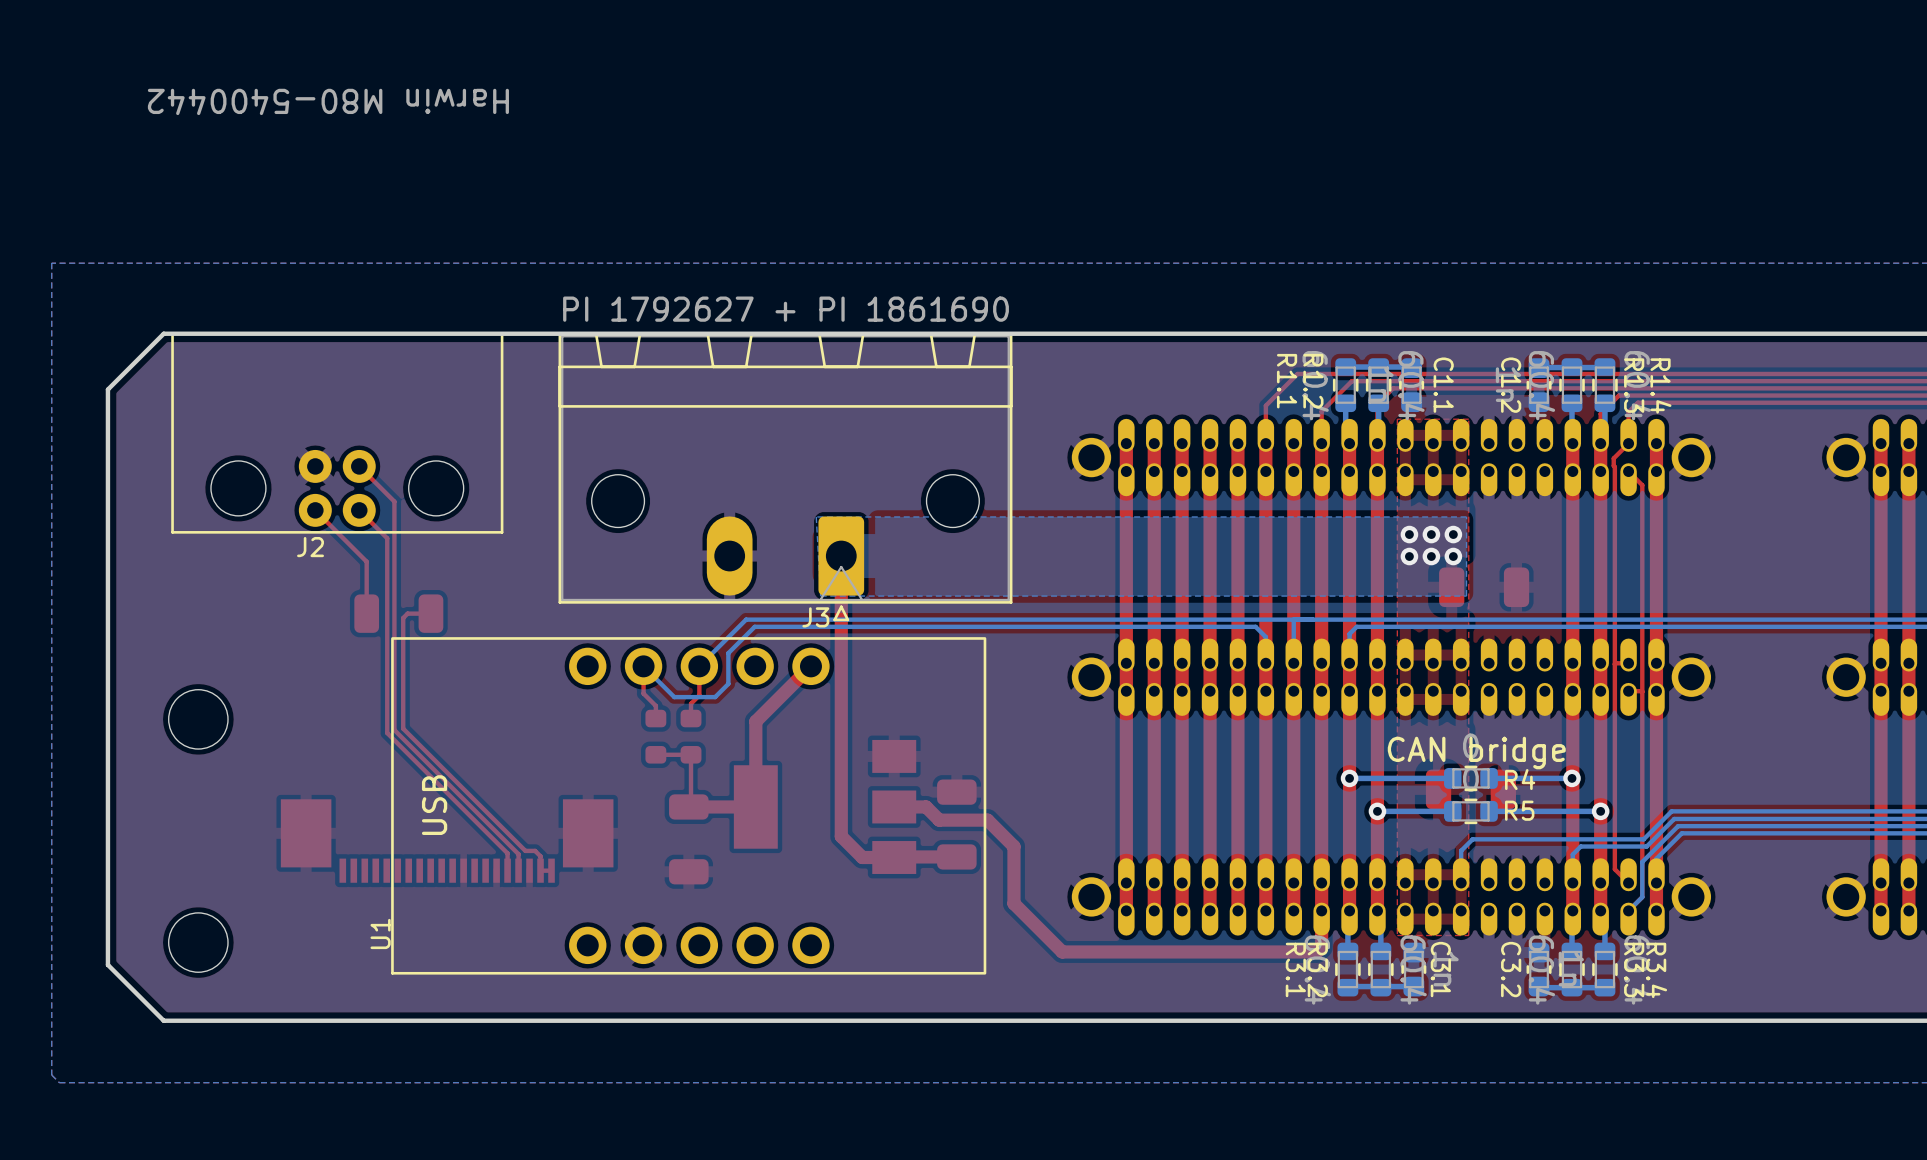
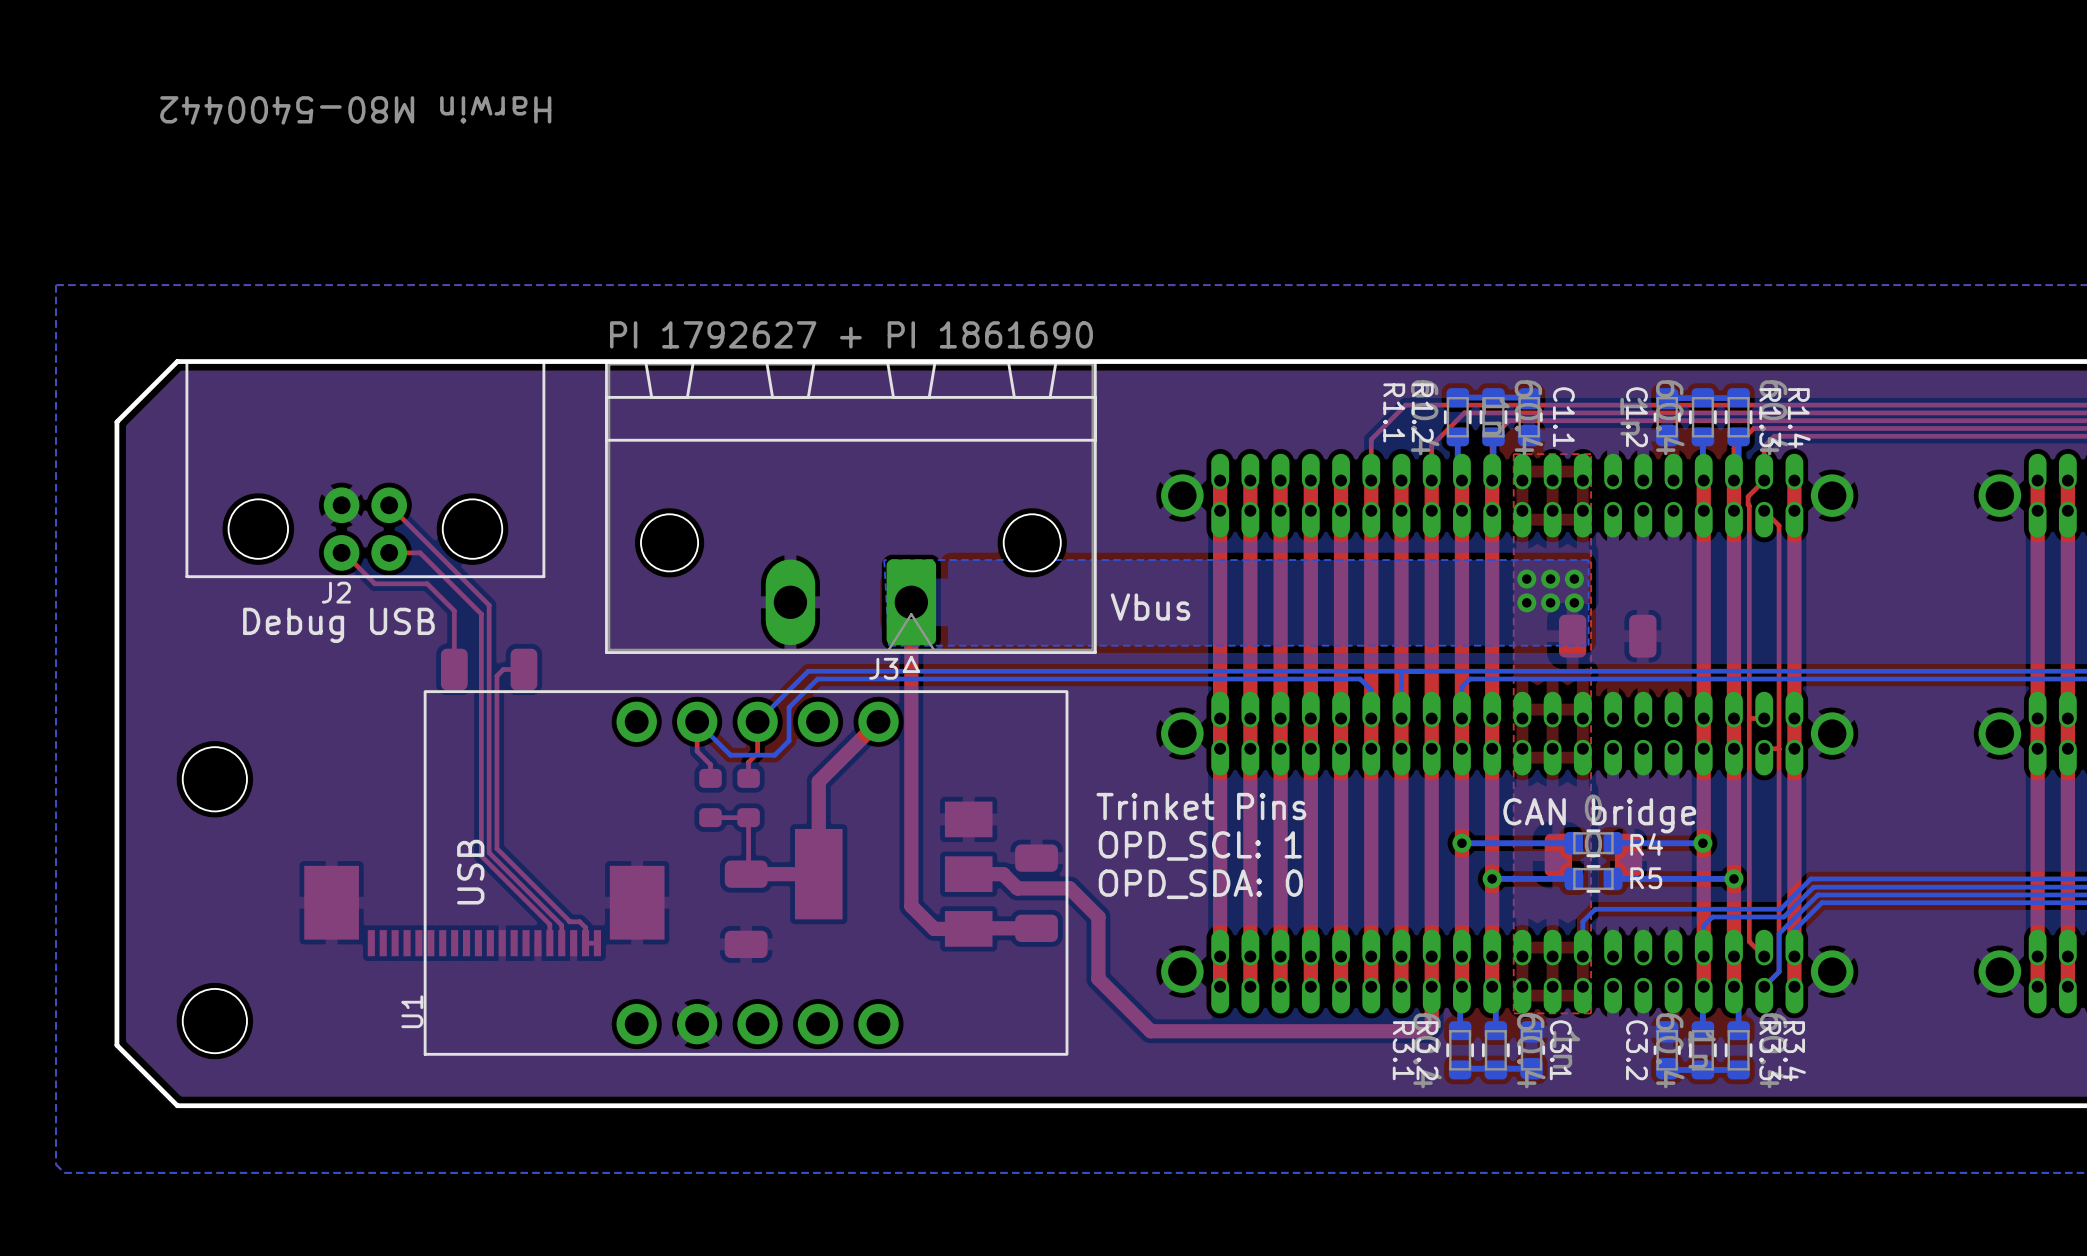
top track: (394, 501) (394, 730) (451, 787) -> (427, 543) (489, 605) (489, 852)
top track: (315, 510) (366, 561) (366, 613) -> (341, 552) (343, 552) (374, 583) (427, 583) (454, 610) (454, 669)
top track: (359, 510) (387, 538) (387, 733) (444, 790) -> (389, 552) (420, 552) (481, 614) (481, 855)
text: none -> Vbus (1150, 607)
text: none -> Debug USB (338, 625)
part position: (398, 613) -> (489, 669)
top track: (420, 613) (407, 613) (403, 618) (403, 728) (525, 850) -> (523, 669) (503, 669) (496, 675) (496, 848) (570, 921)
text: none -> Trinket Pins (1201, 806)
text: none -> OPD_SCL: 1 (1200, 845)
text: none -> OPD_SDA: 0 (1200, 884)

